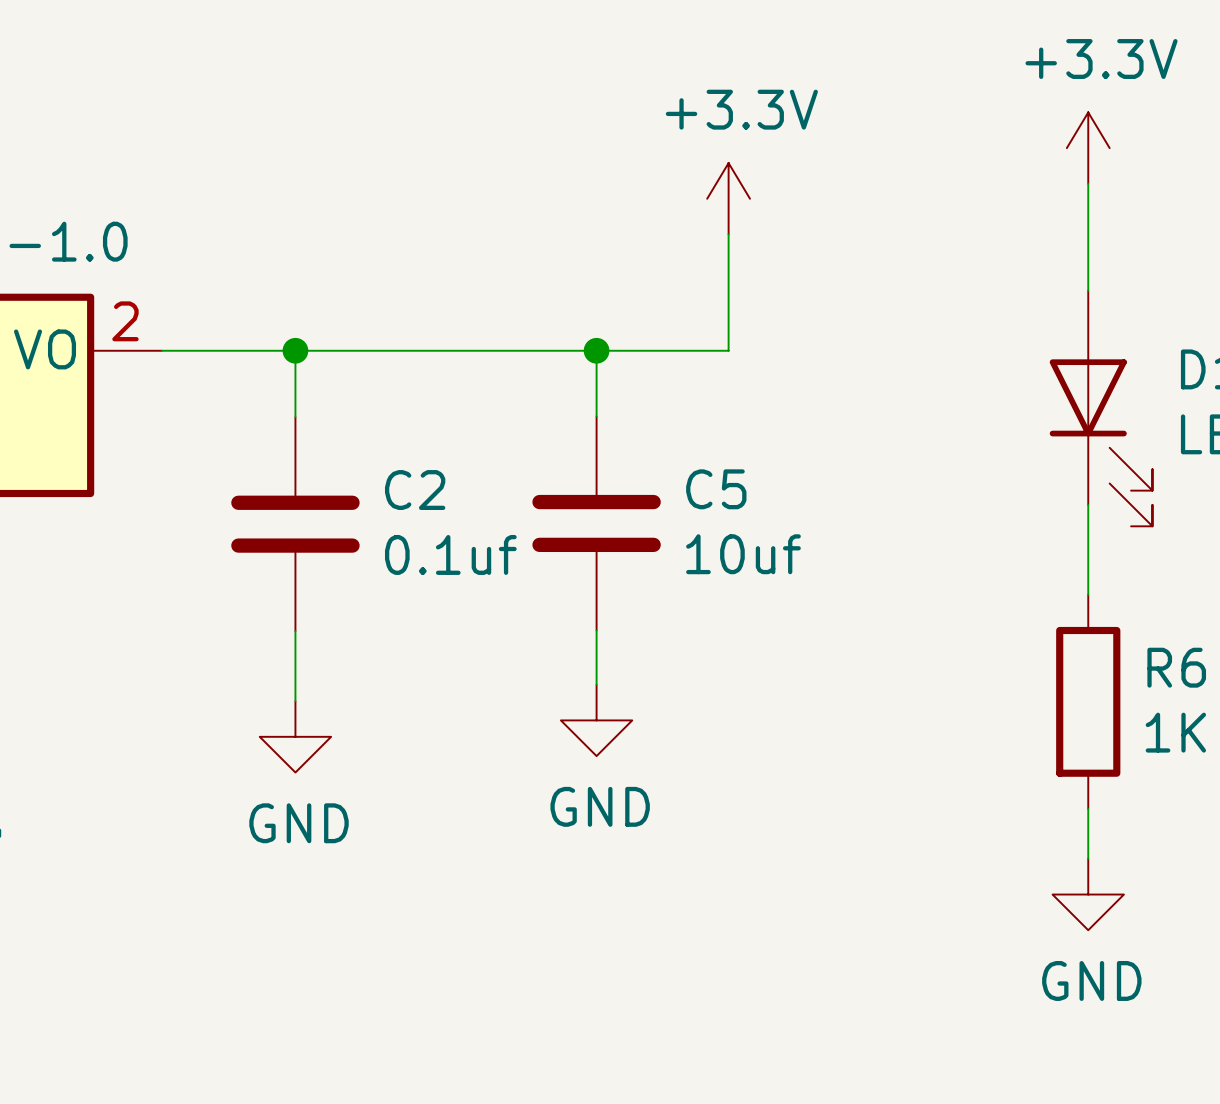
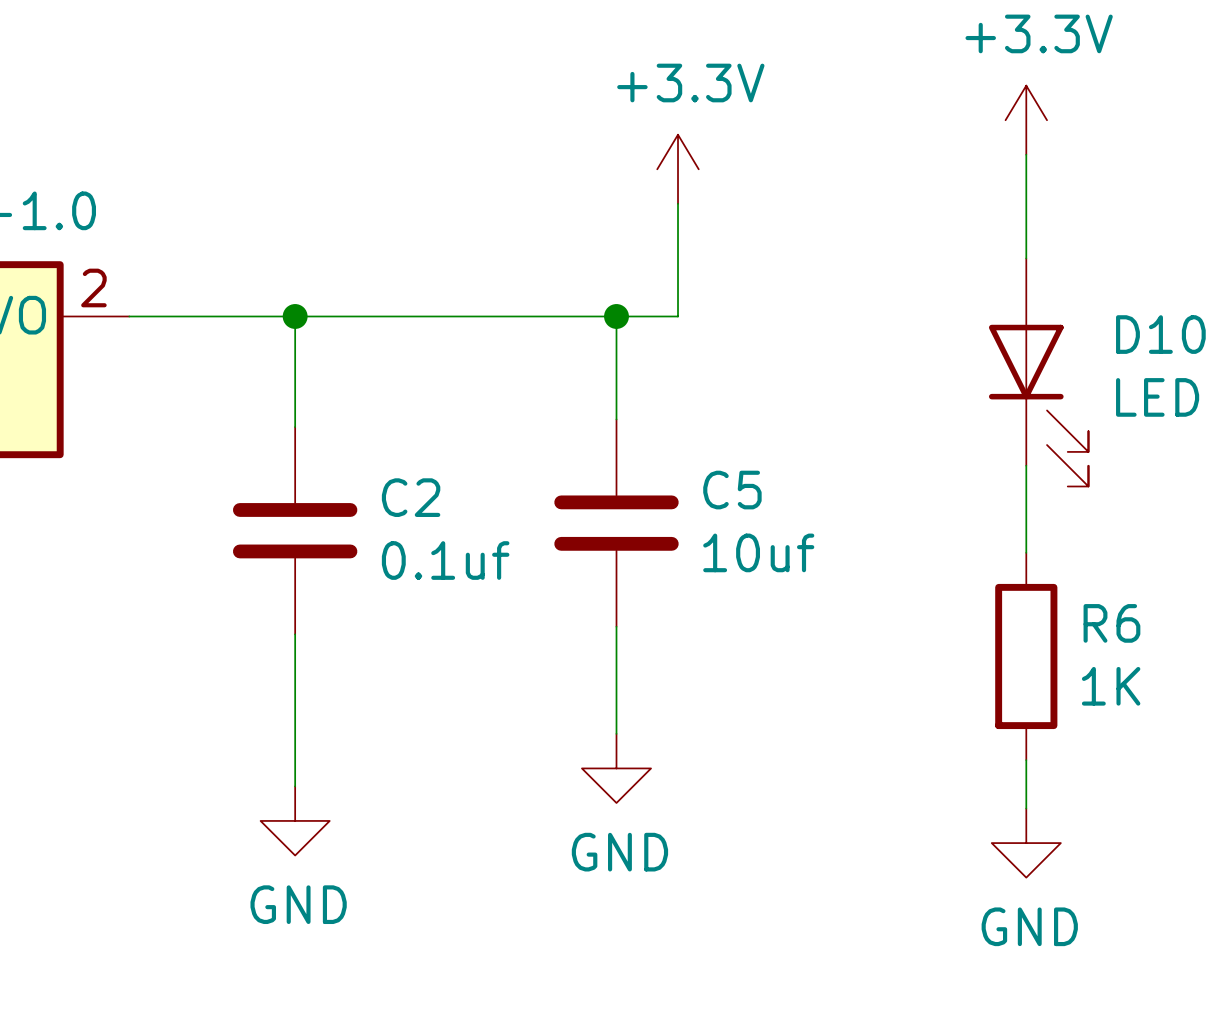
wire: (295, 350) (295, 417) -> none
junction position: (295, 350) -> (295, 316)
wire: none -> (295, 316) (295, 427)
wire: (596, 350) (596, 416) -> none
junction position: (596, 350) -> (616, 316)
wire: none -> (616, 316) (616, 419)
C5 position: (596, 523) -> (616, 523)
C2 position: (295, 524) -> (295, 530)
wire: (596, 630) (596, 684) -> none
wire: (295, 631) (295, 701) -> none
wire: none -> (616, 626) (616, 733)
wire: none -> (295, 634) (295, 786)
power symbol position: GND (596, 720) -> GND (616, 768)
power symbol position: GND (295, 736) -> GND (295, 820)

